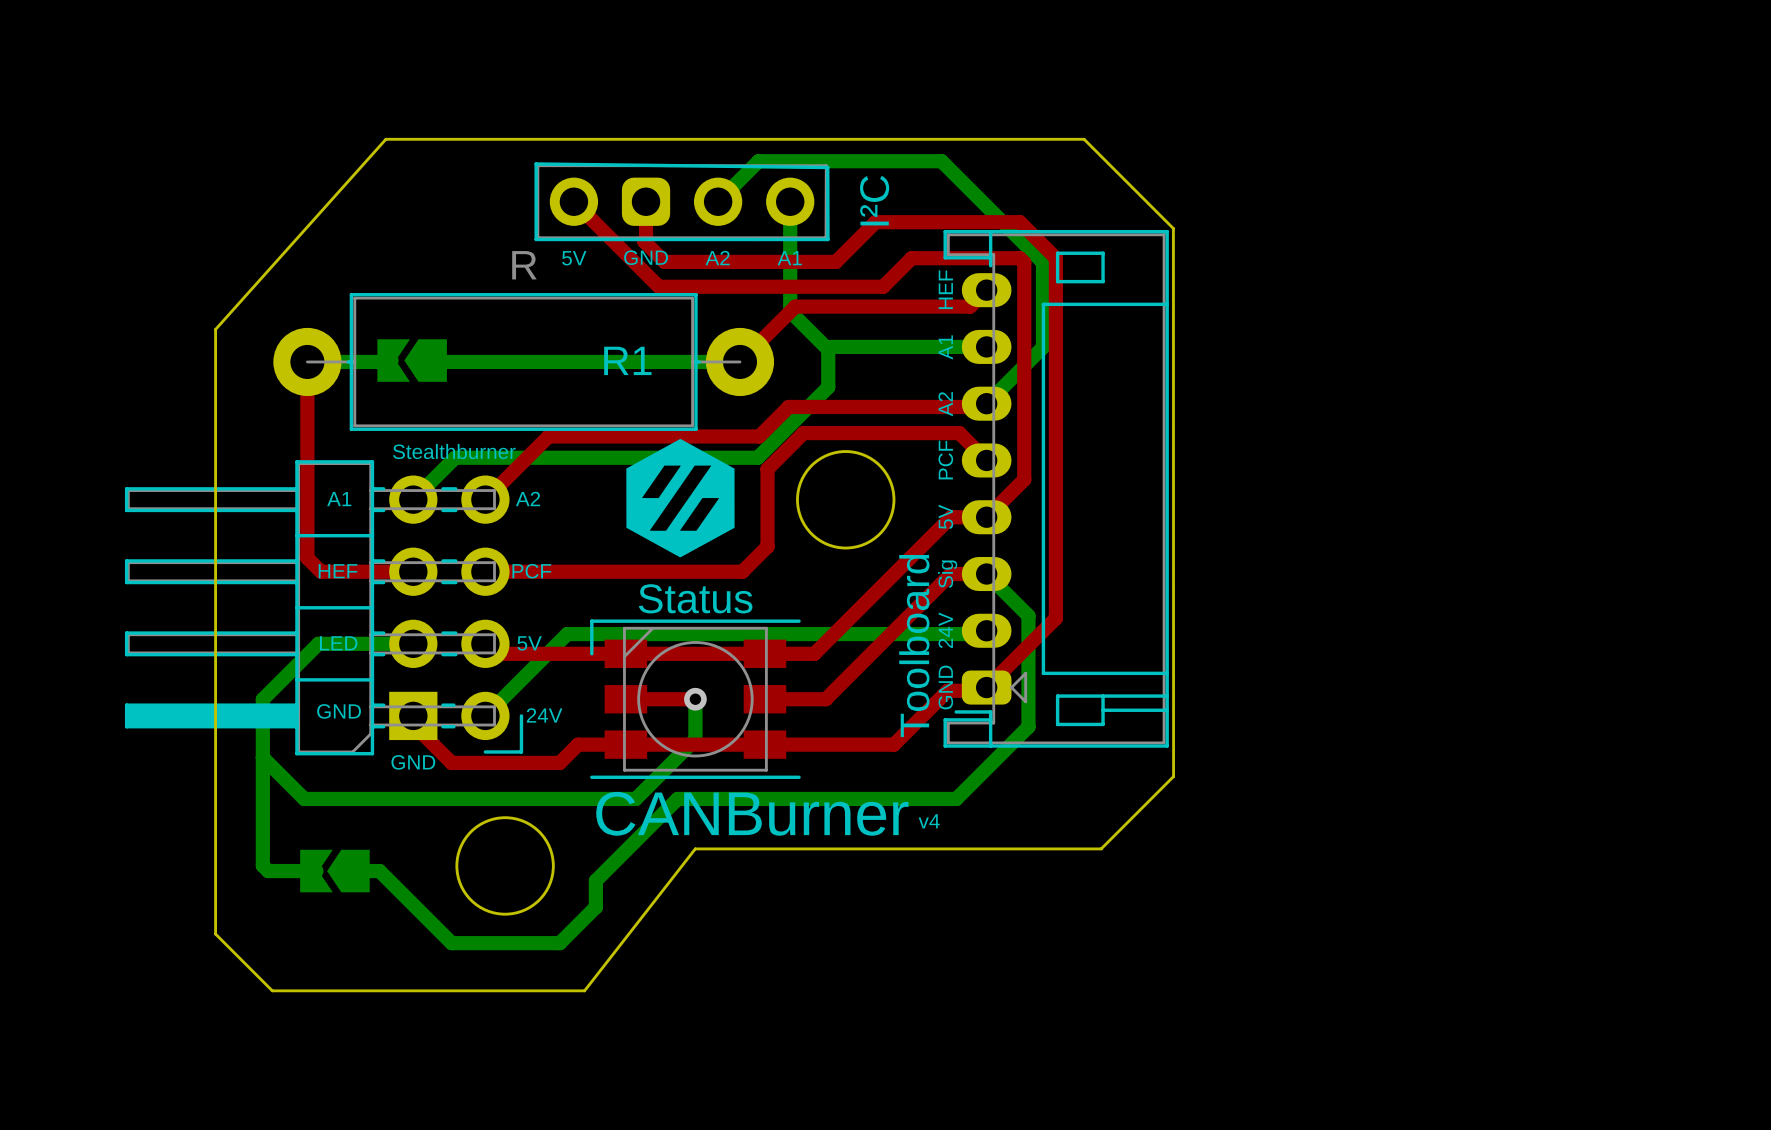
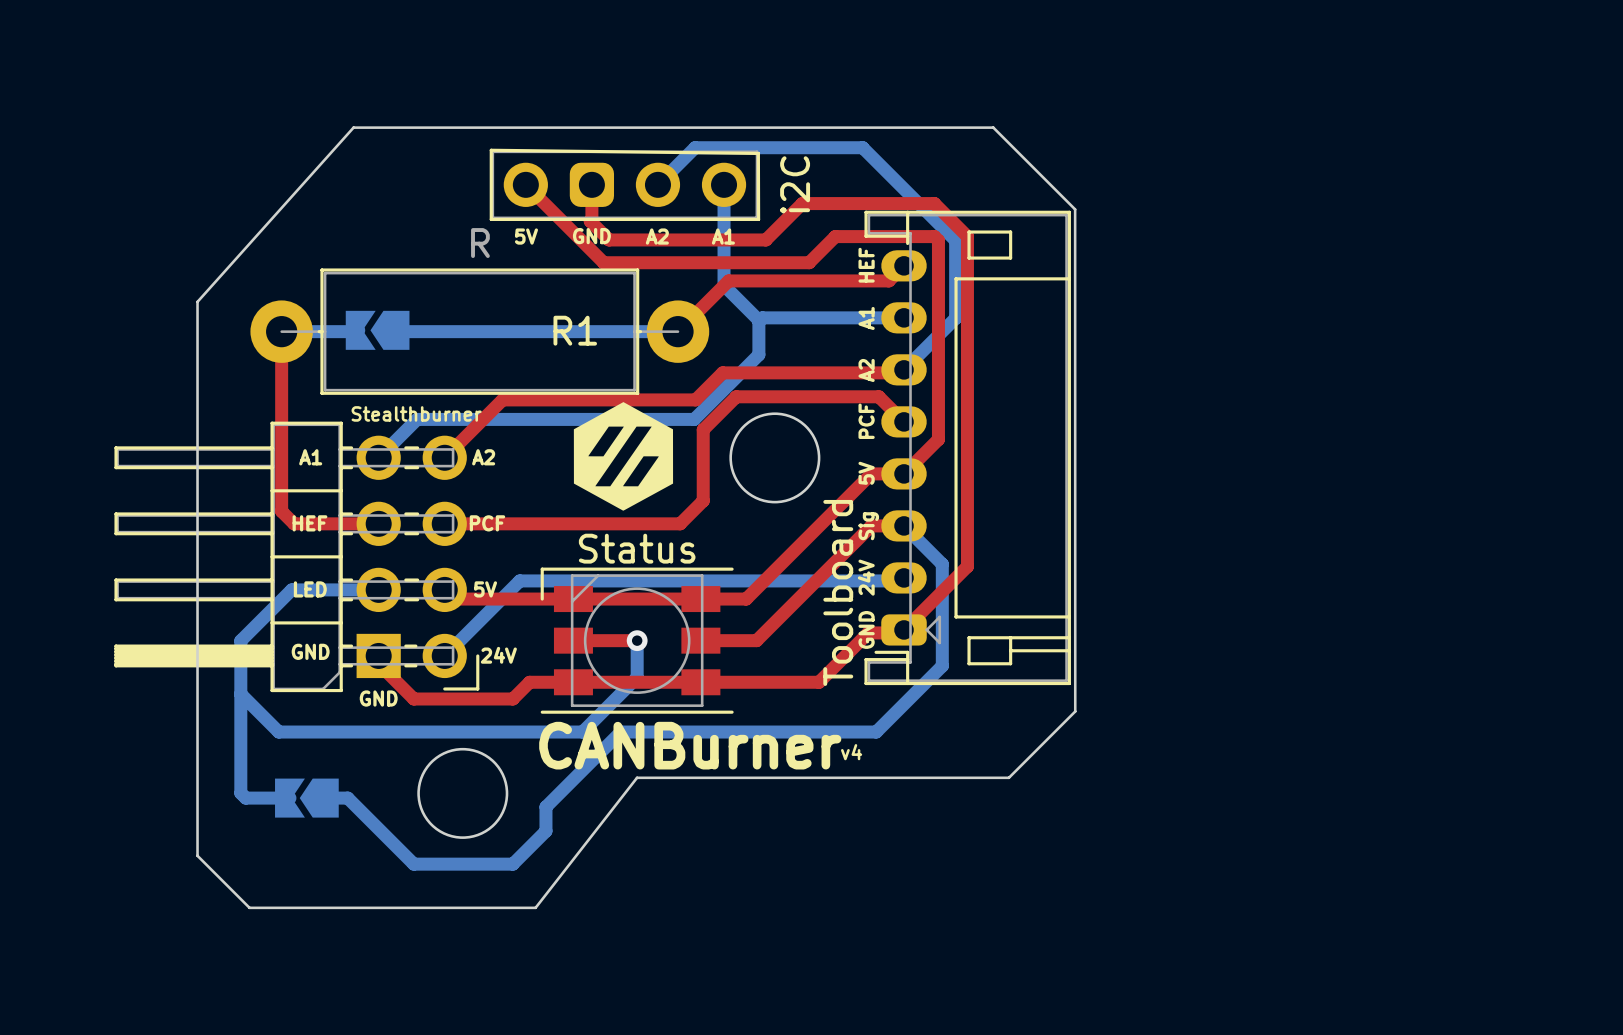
I²C name: I²C (874, 200) -> i2C (795, 184)

